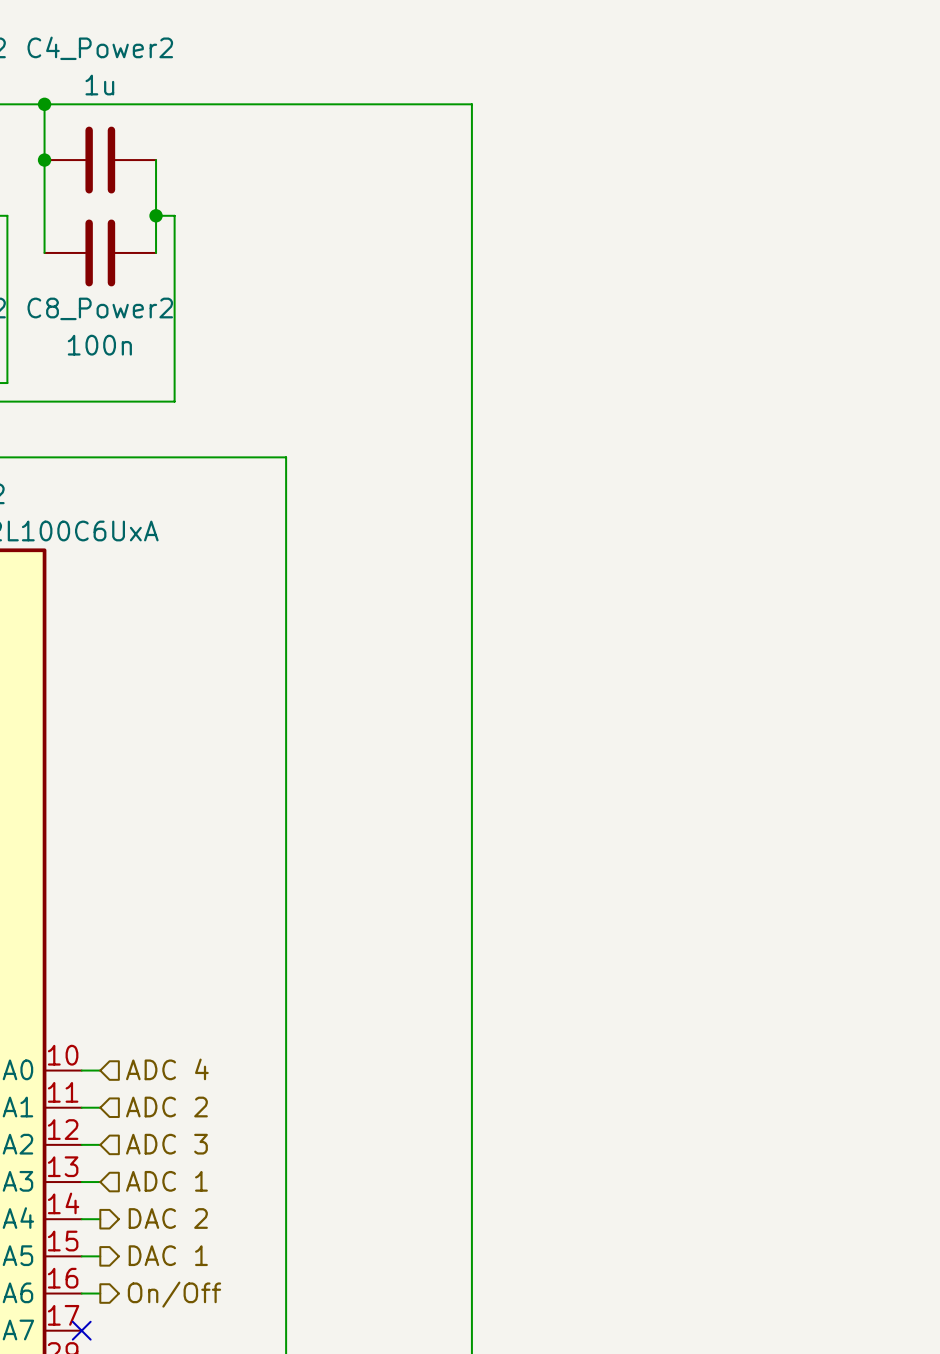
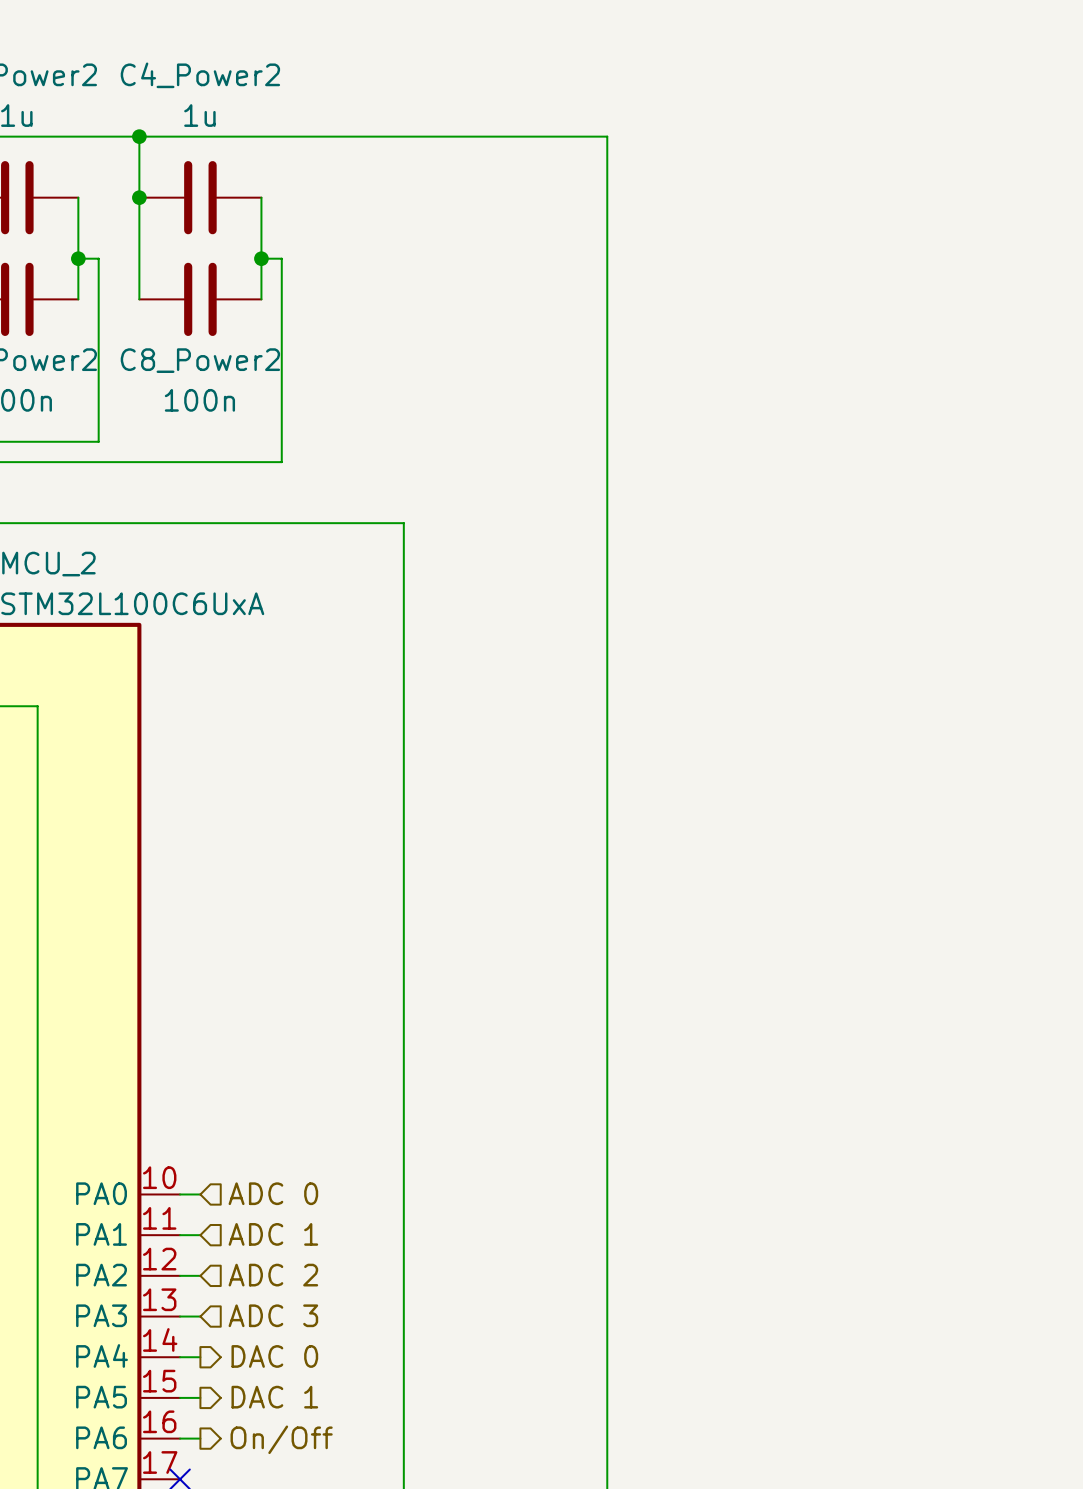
hierarchical label: ADC 4 (167, 1069) -> ADC 0 (273, 1193)
hierarchical label: ADC 2 (166, 1107) -> ADC 1 (273, 1234)
hierarchical label: ADC 3 (166, 1144) -> ADC 2 (273, 1275)
hierarchical label: ADC 1 (166, 1181) -> ADC 3 (273, 1315)
hierarchical label: DAC 2 (168, 1218) -> DAC 0 (274, 1356)

